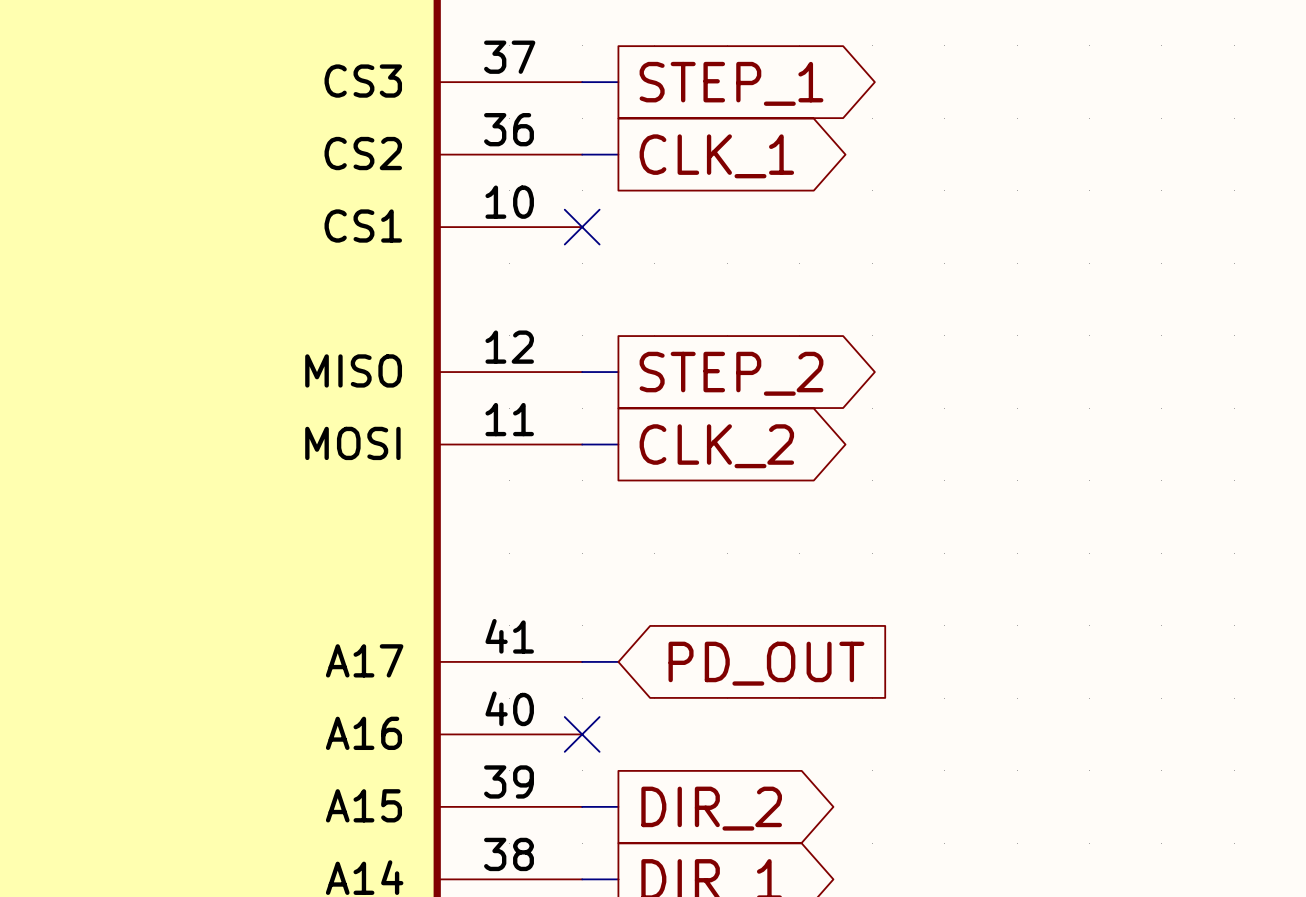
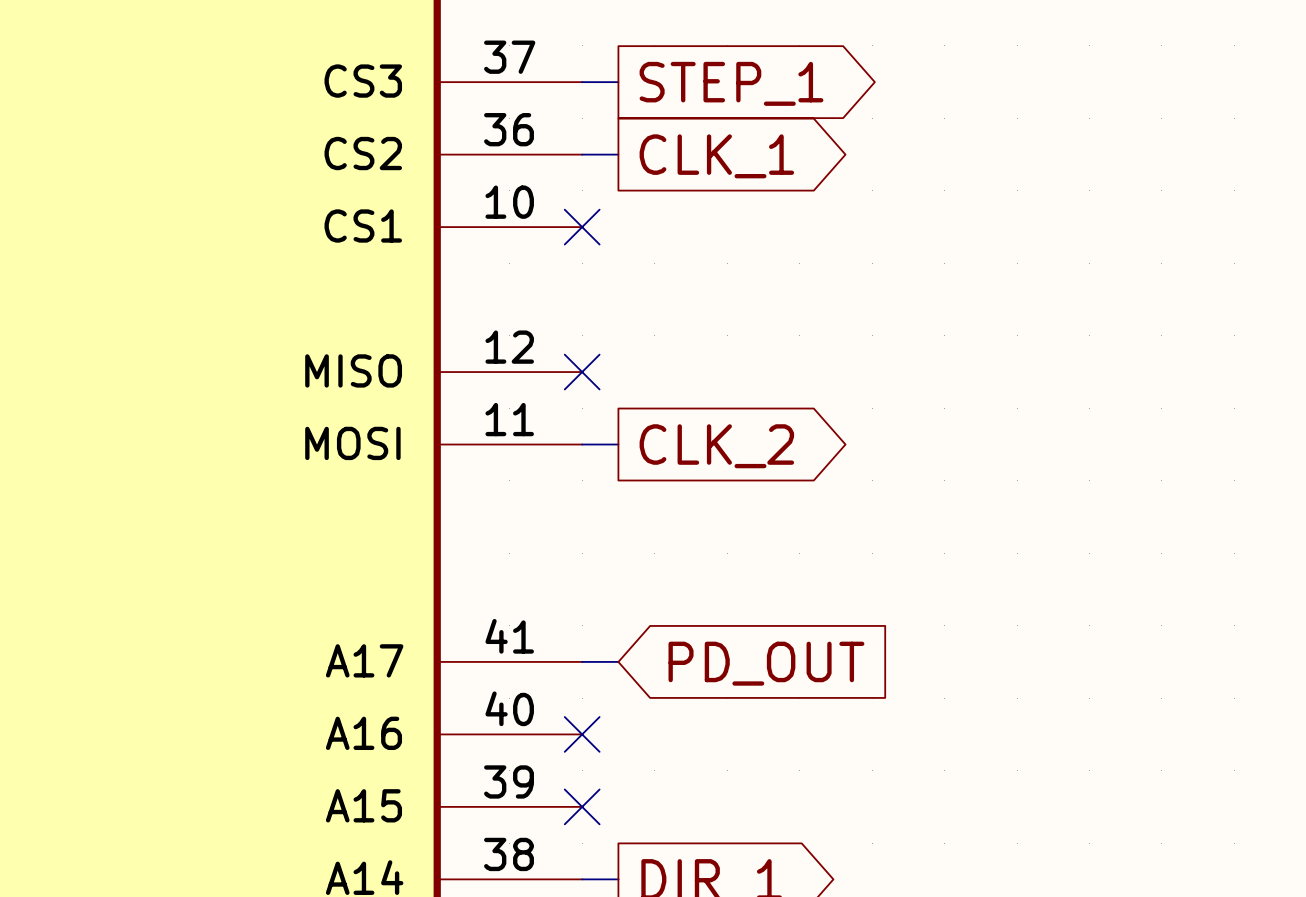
wire: (582, 372) (618, 372) -> none
no-connect mark: none -> (582, 372)
global label: STEP_2 (731, 373) -> none
wire: (582, 806) (618, 806) -> none
no-connect mark: none -> (582, 806)
global label: DIR_2 (711, 808) -> none

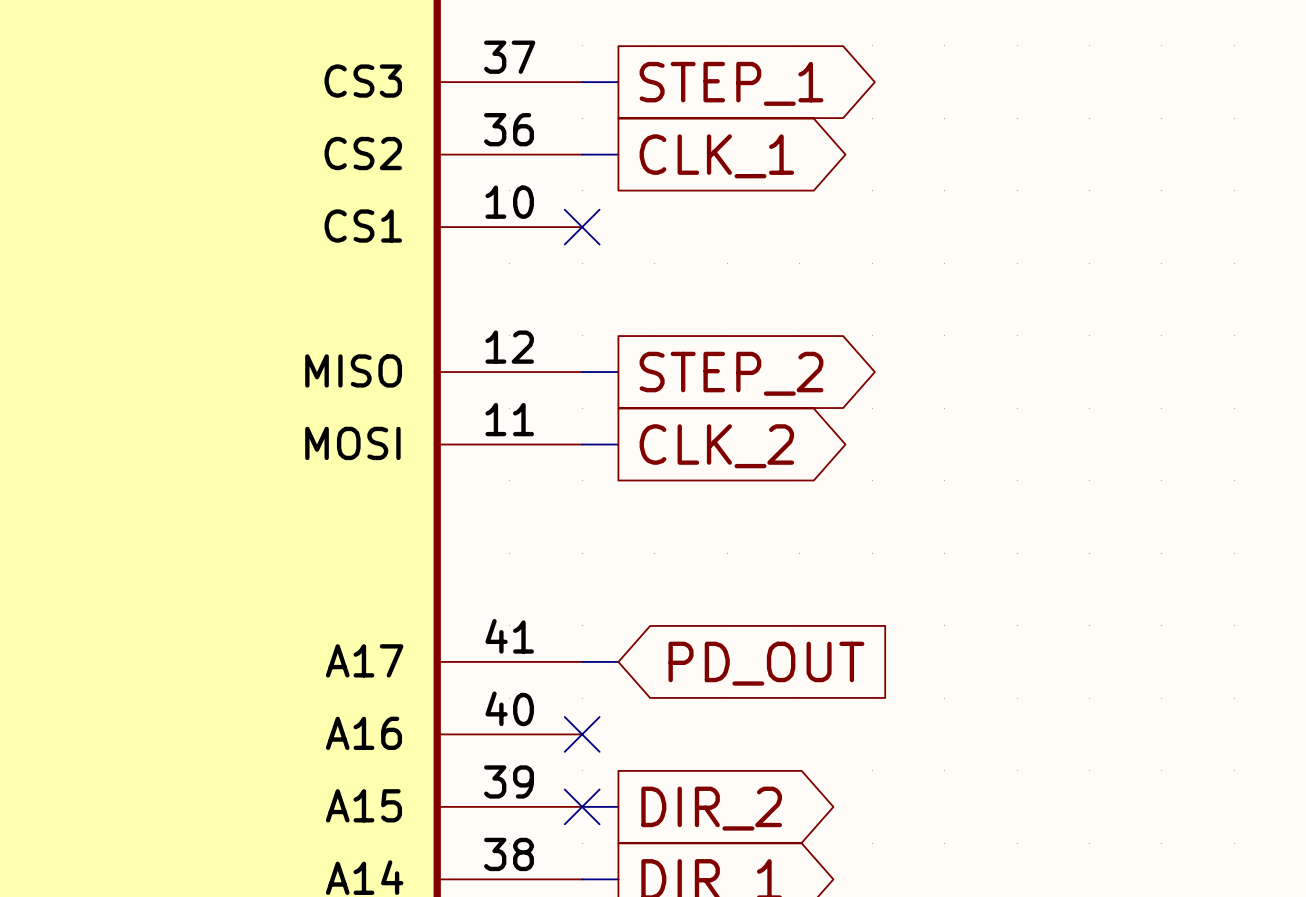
wire: none -> (582, 372) (618, 372)
no-connect mark: (582, 372) -> none
global label: none -> STEP_2 (731, 373)
wire: none -> (582, 806) (618, 806)
global label: none -> DIR_2 (711, 808)

